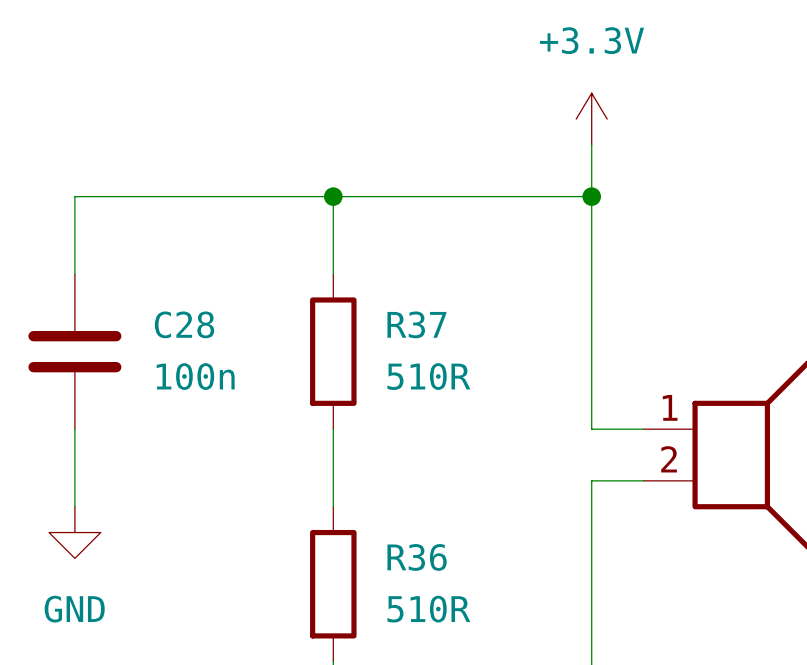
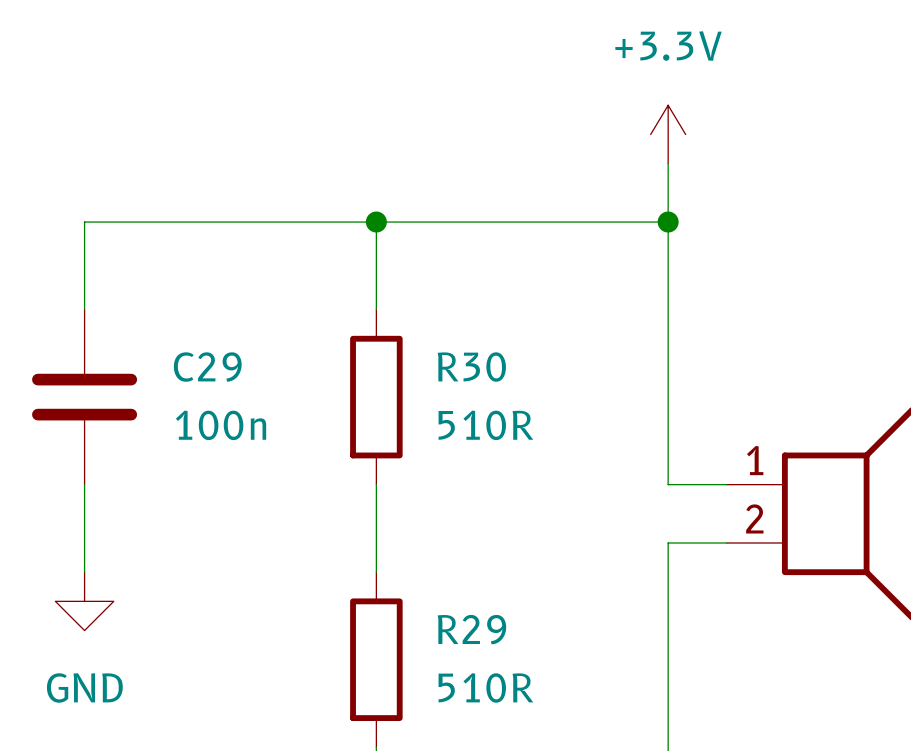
C28 name: C28 (184, 324) -> C29 (207, 367)
R37 name: R37 (416, 324) -> R30 (471, 367)
R36 name: R36 (417, 557) -> R29 (471, 629)

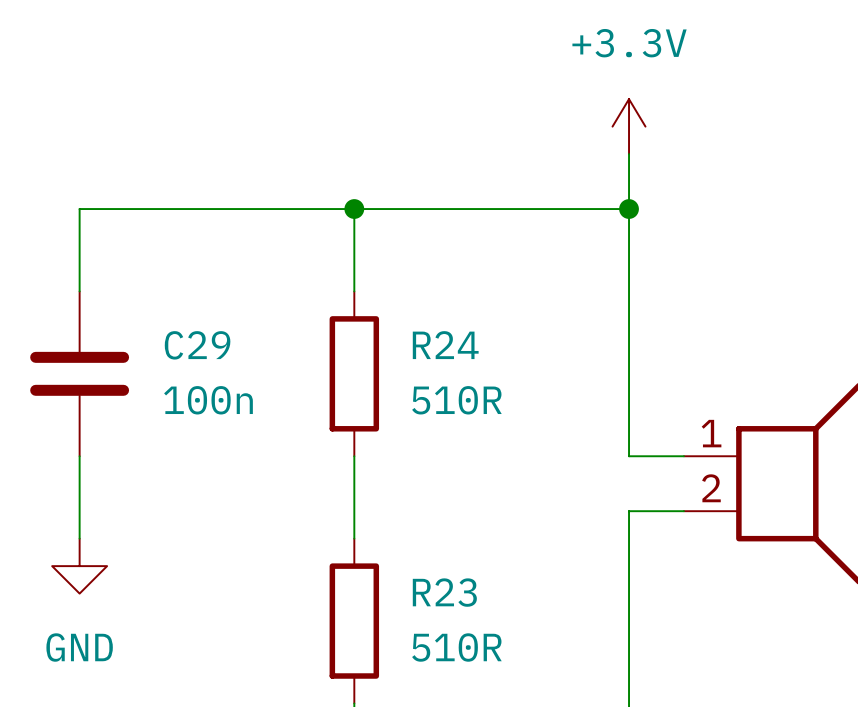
R30 name: R30 (471, 367) -> R24 (445, 345)
R29 name: R29 (471, 629) -> R23 (444, 592)

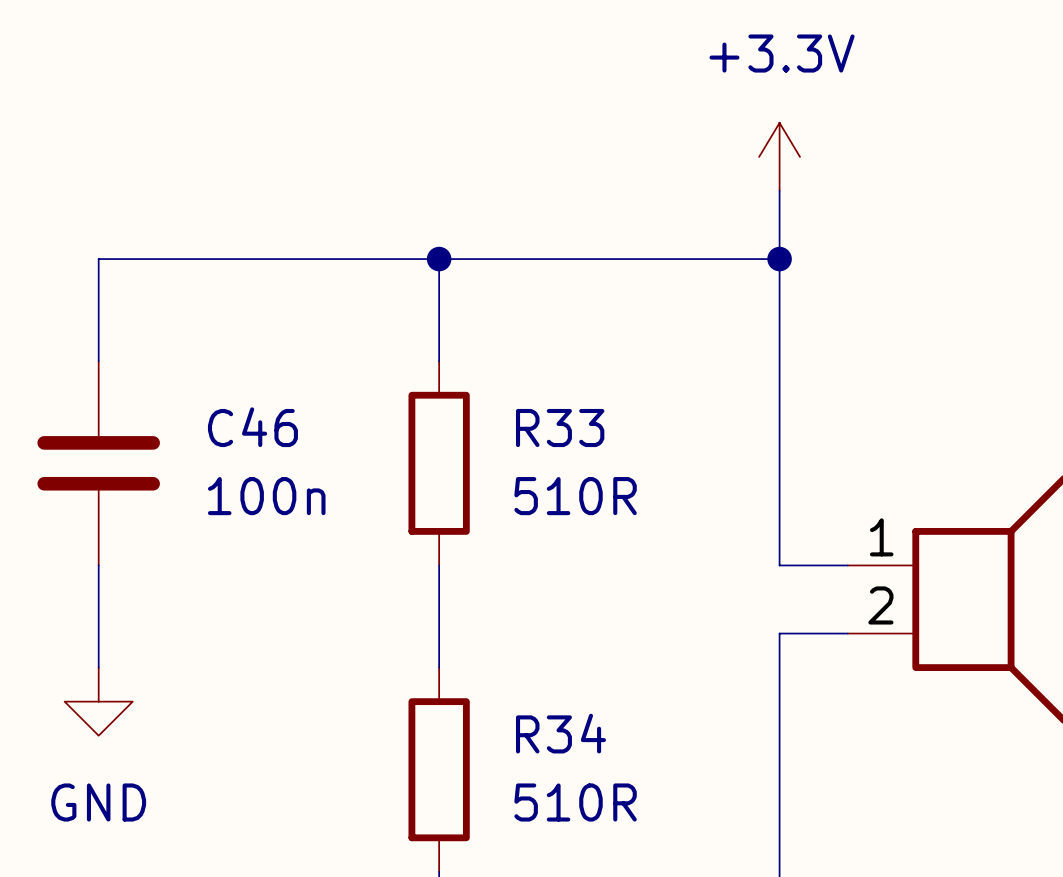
C29 name: C29 (197, 345) -> C46 (252, 427)
R24 name: R24 (445, 345) -> R33 (560, 428)
R23 name: R23 (444, 592) -> R34 (560, 733)

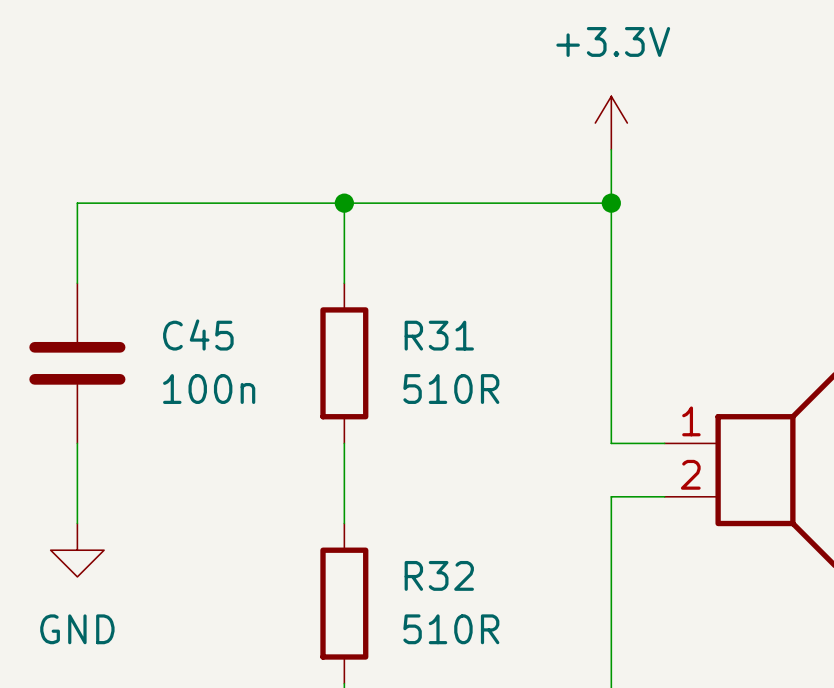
C46 name: C46 (252, 427) -> C45 (198, 334)
R33 name: R33 (560, 428) -> R31 (439, 335)
R34 name: R34 (560, 733) -> R32 (439, 575)

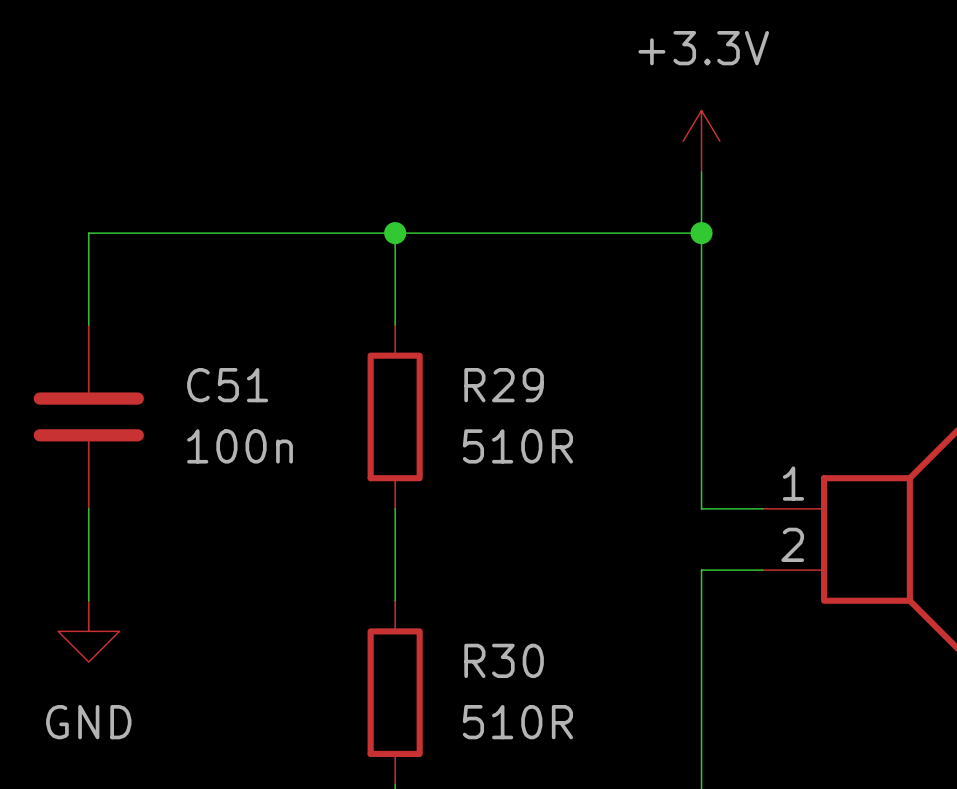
C45 name: C45 (198, 334) -> C51 (227, 385)
R31 name: R31 (439, 335) -> R29 (504, 385)
R32 name: R32 (439, 575) -> R30 (504, 660)

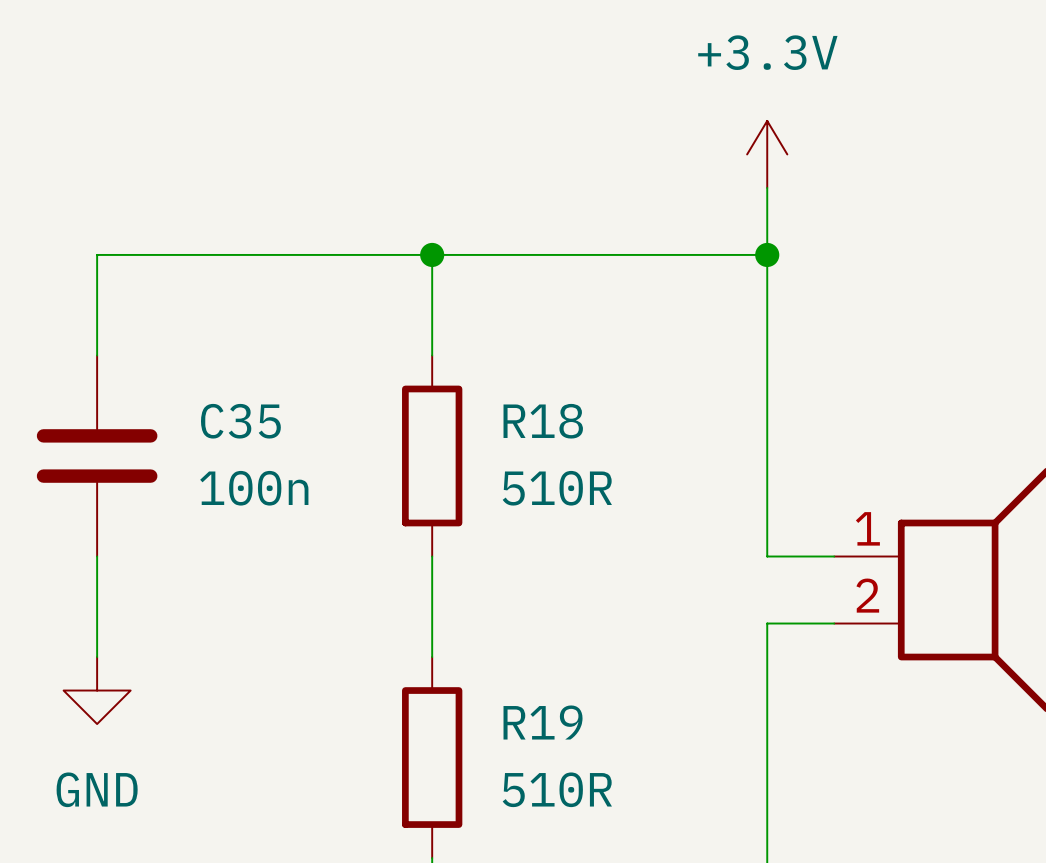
C51 name: C51 (227, 385) -> C35 (240, 421)
R29 name: R29 (504, 385) -> R18 (543, 421)
R30 name: R30 (504, 660) -> R19 (543, 722)

